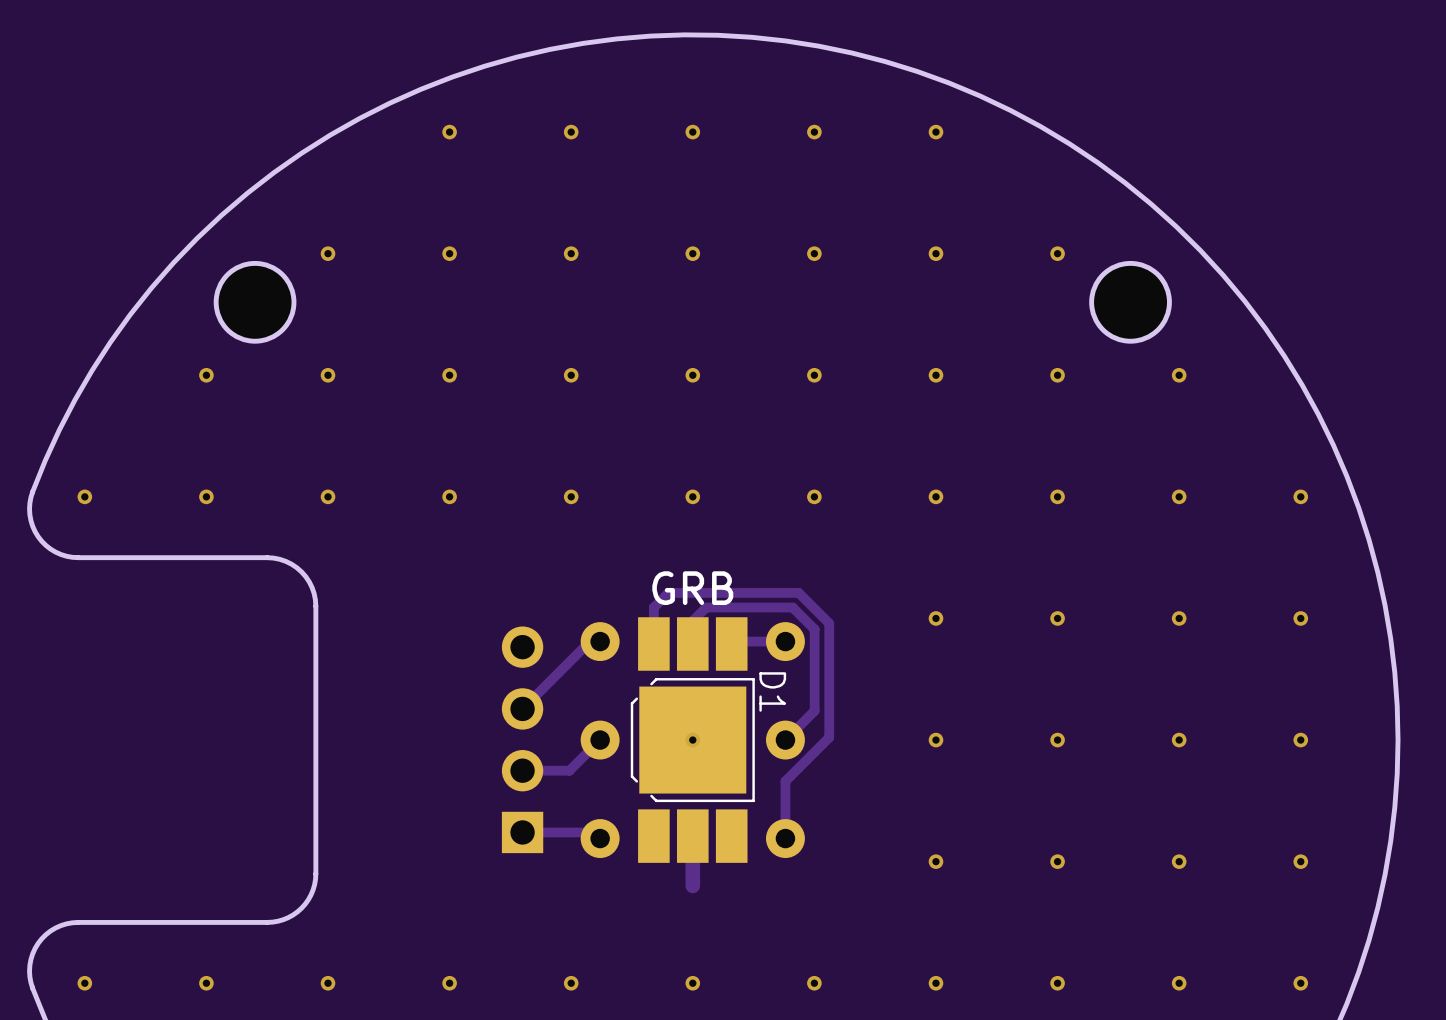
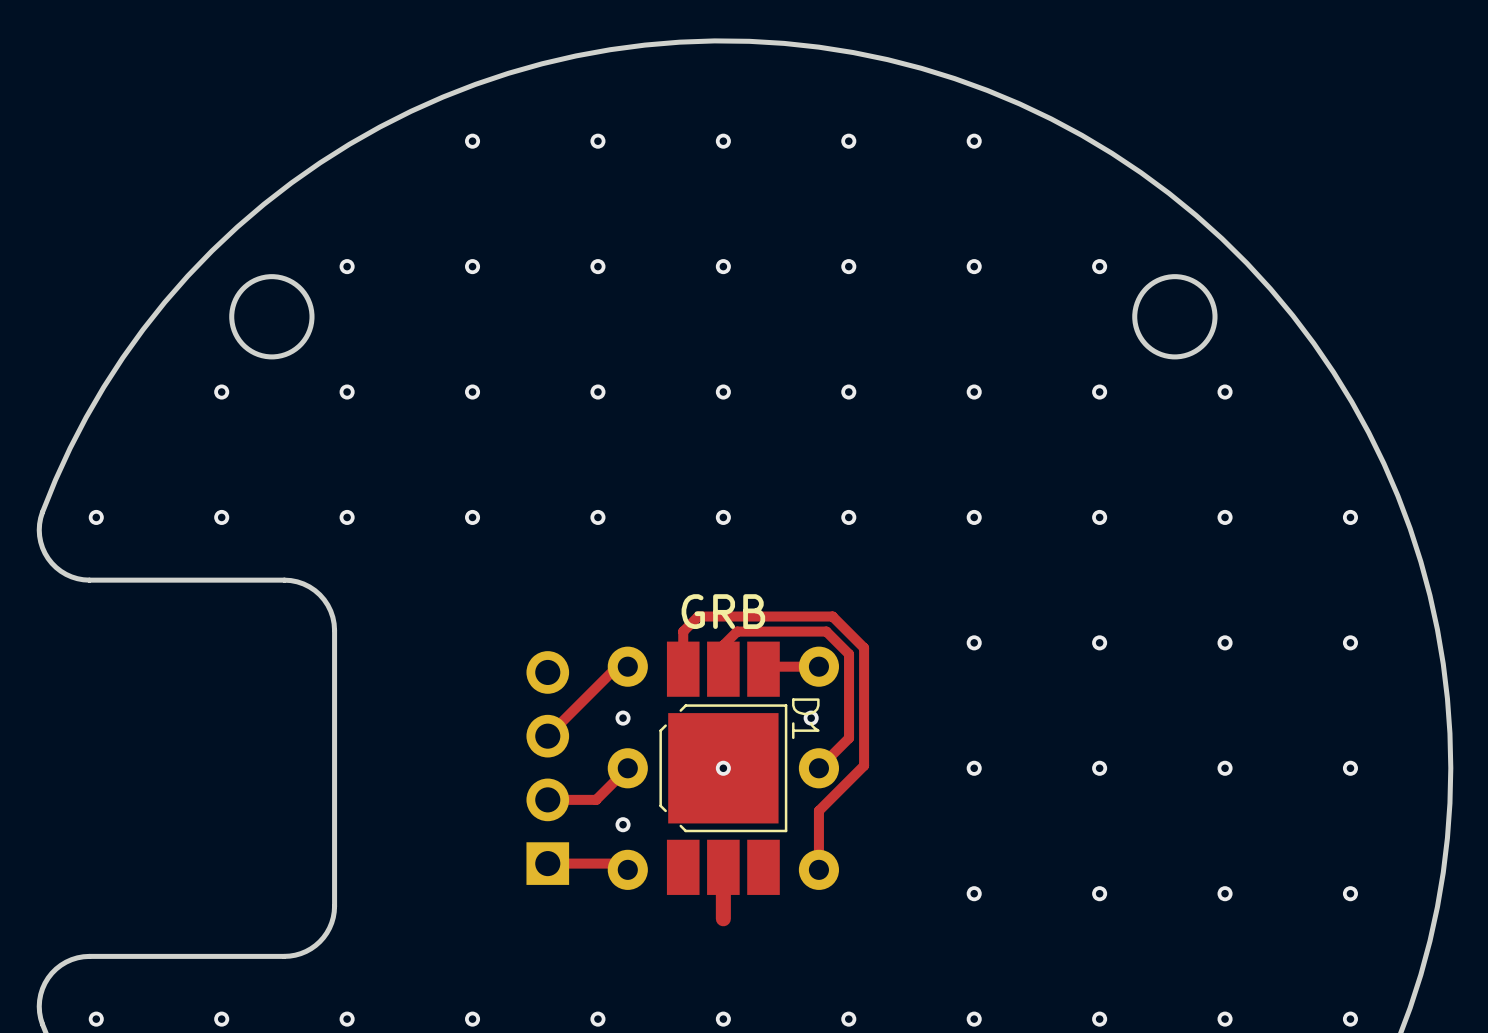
via: none -> (623, 718)
via: none -> (811, 718)
via: none -> (623, 824)

